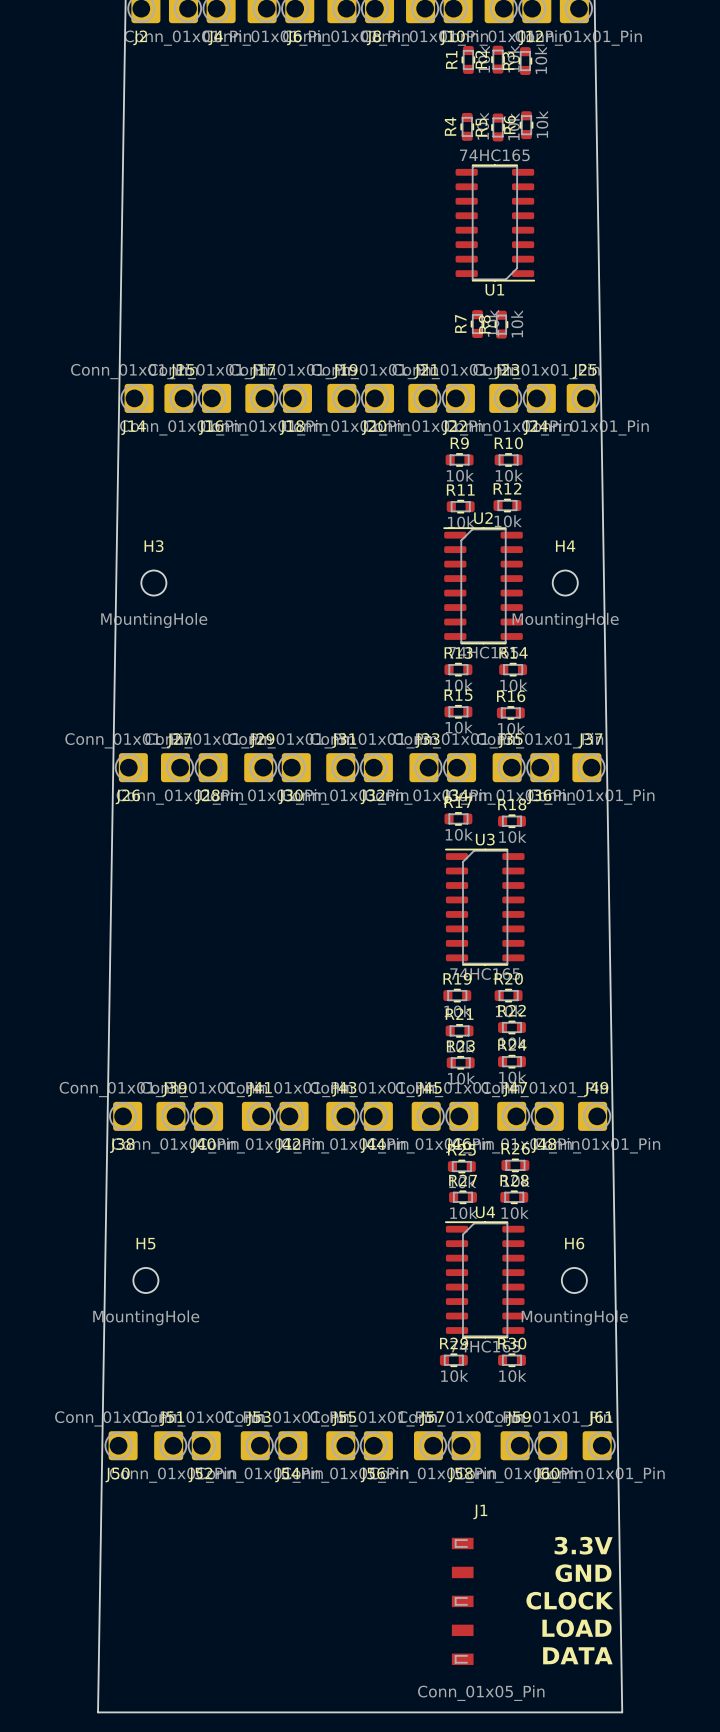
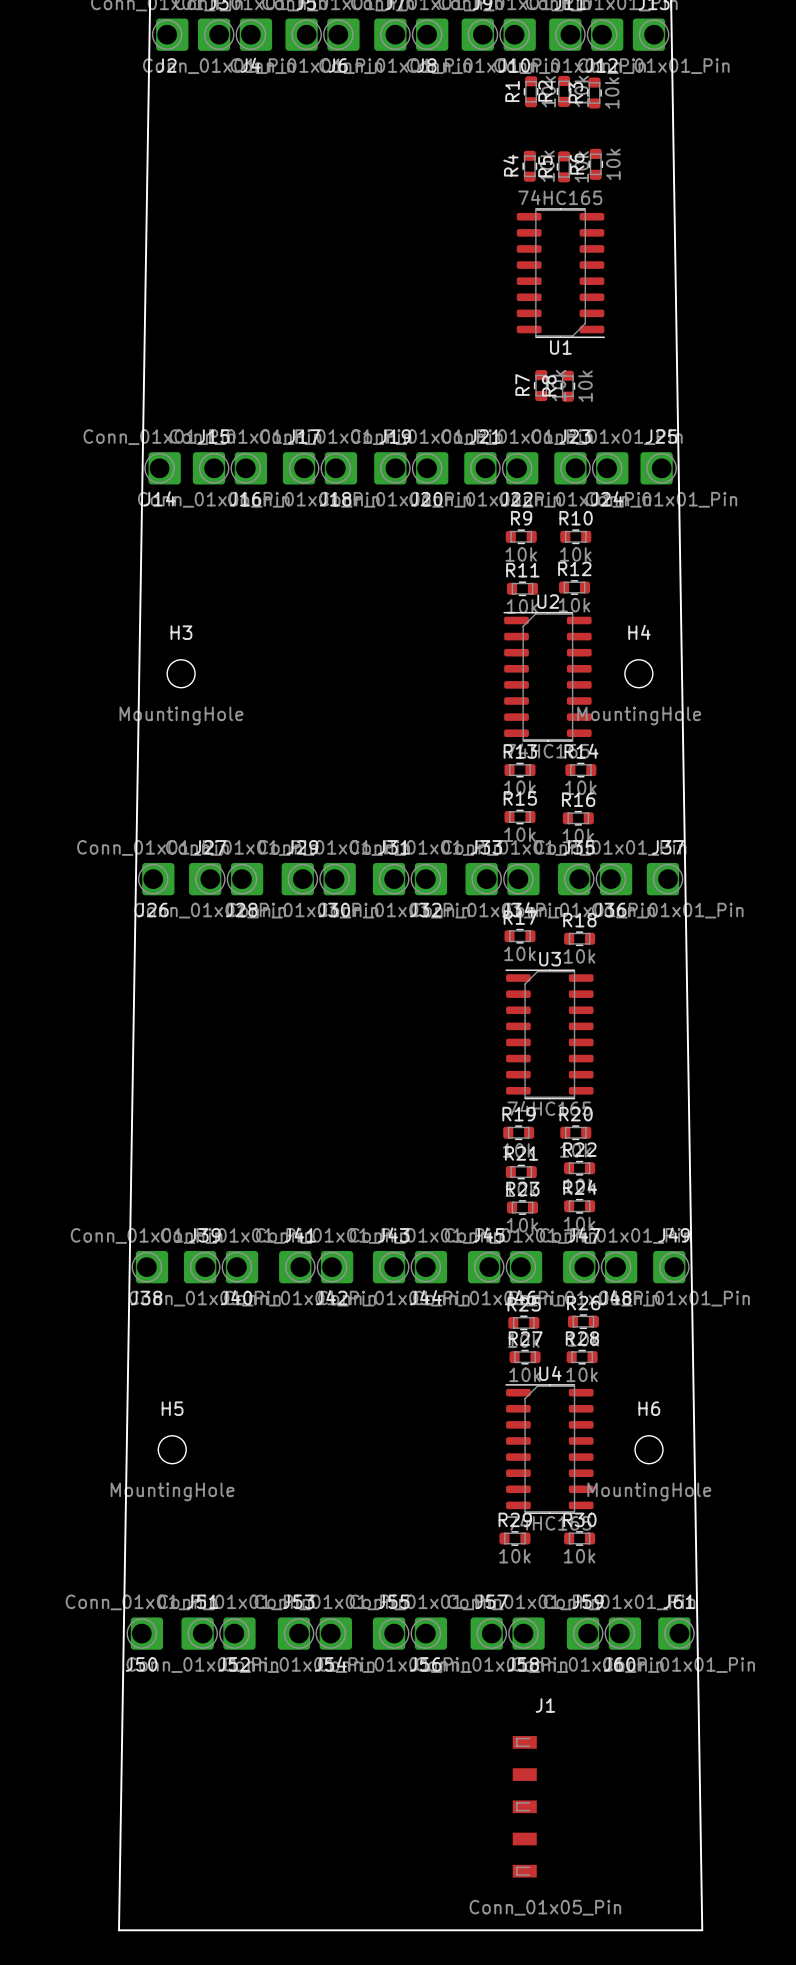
text: 3.3V (583, 1545) -> none
text: GND (583, 1573) -> none
text: CLOCK (569, 1600) -> none
text: LOAD (576, 1628) -> none
text: DATA (577, 1655) -> none

